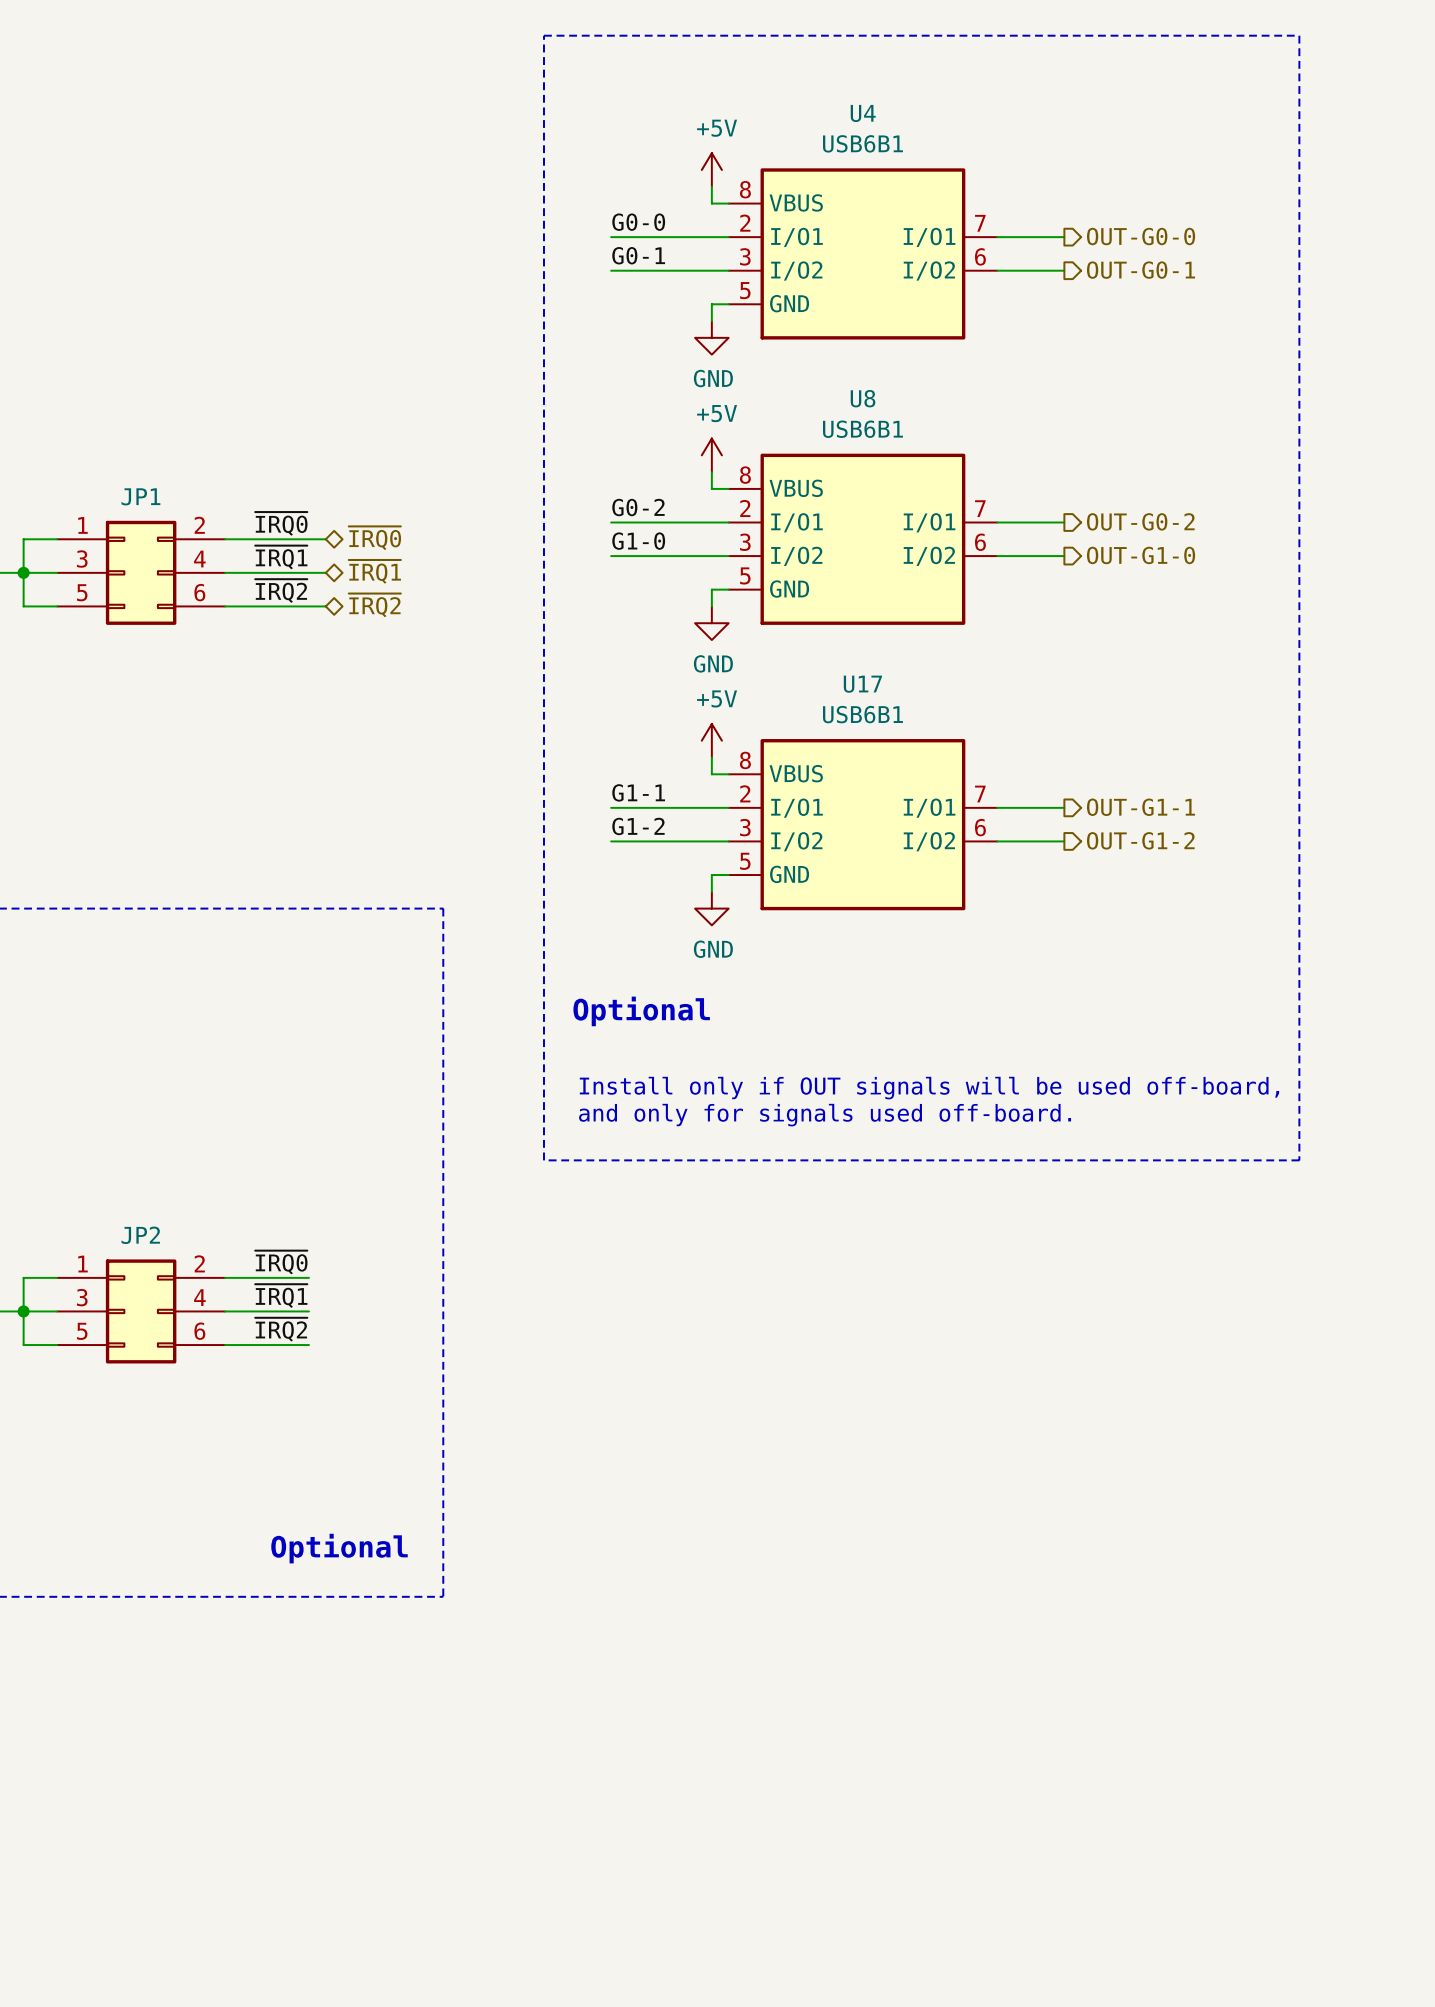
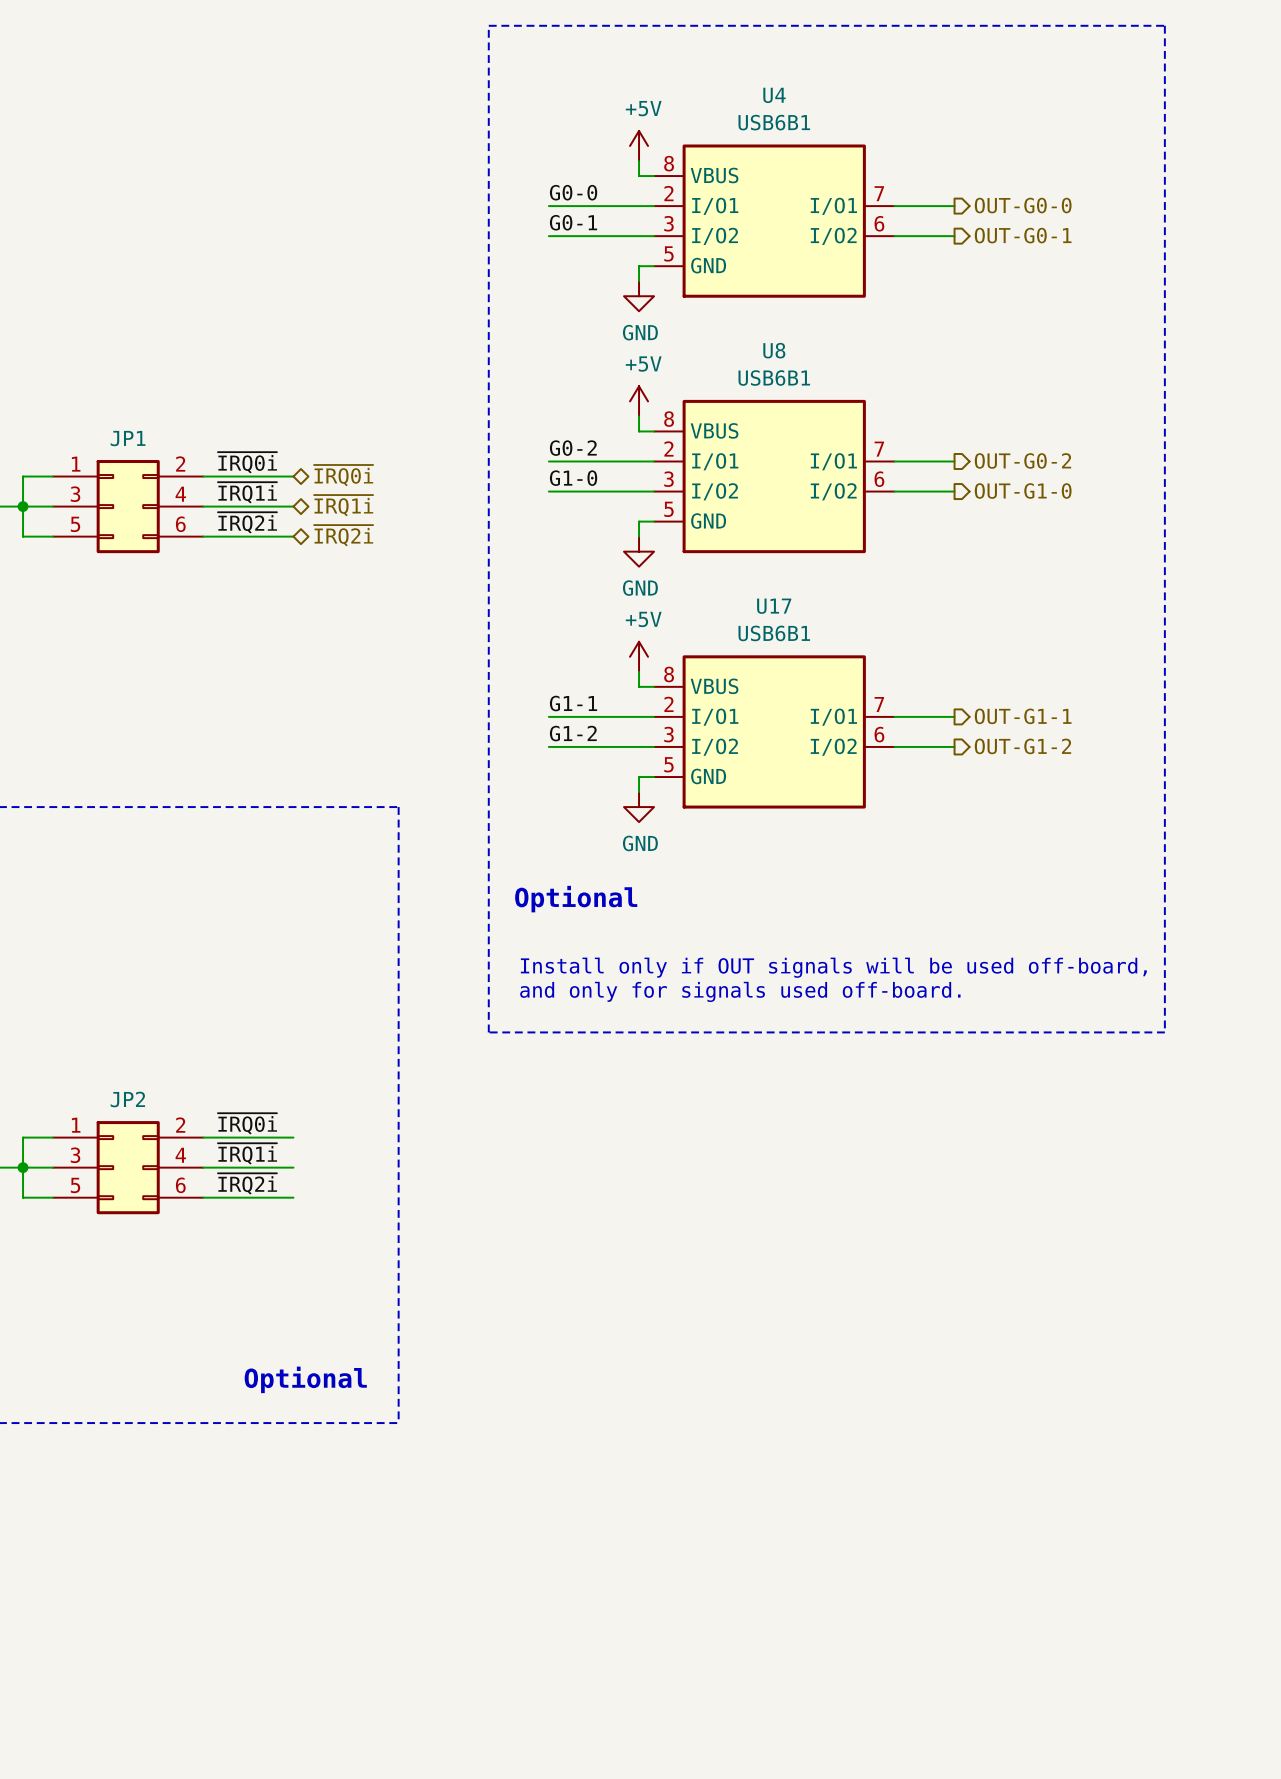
label: ~{IRQ0} (281, 523) -> ~{IRQ0i} (247, 462)
hierarchical label: ~{IRQ0} (374, 538) -> ~{IRQ0i} (343, 475)
label: ~{IRQ1} (281, 557) -> ~{IRQ1i} (247, 492)
hierarchical label: ~{IRQ1} (374, 571) -> ~{IRQ1i} (343, 505)
label: ~{IRQ2} (281, 591) -> ~{IRQ2i} (247, 522)
hierarchical label: ~{IRQ2} (374, 605) -> ~{IRQ2i} (343, 535)
label: ~{IRQ0} (281, 1262) -> ~{IRQ0i} (247, 1123)
wire: none -> (278, 1137) (293, 1137)
label: ~{IRQ1} (281, 1296) -> ~{IRQ1i} (247, 1153)
wire: none -> (278, 1167) (293, 1167)
label: ~{IRQ2} (281, 1329) -> ~{IRQ2i} (247, 1183)
wire: none -> (278, 1197) (293, 1197)

